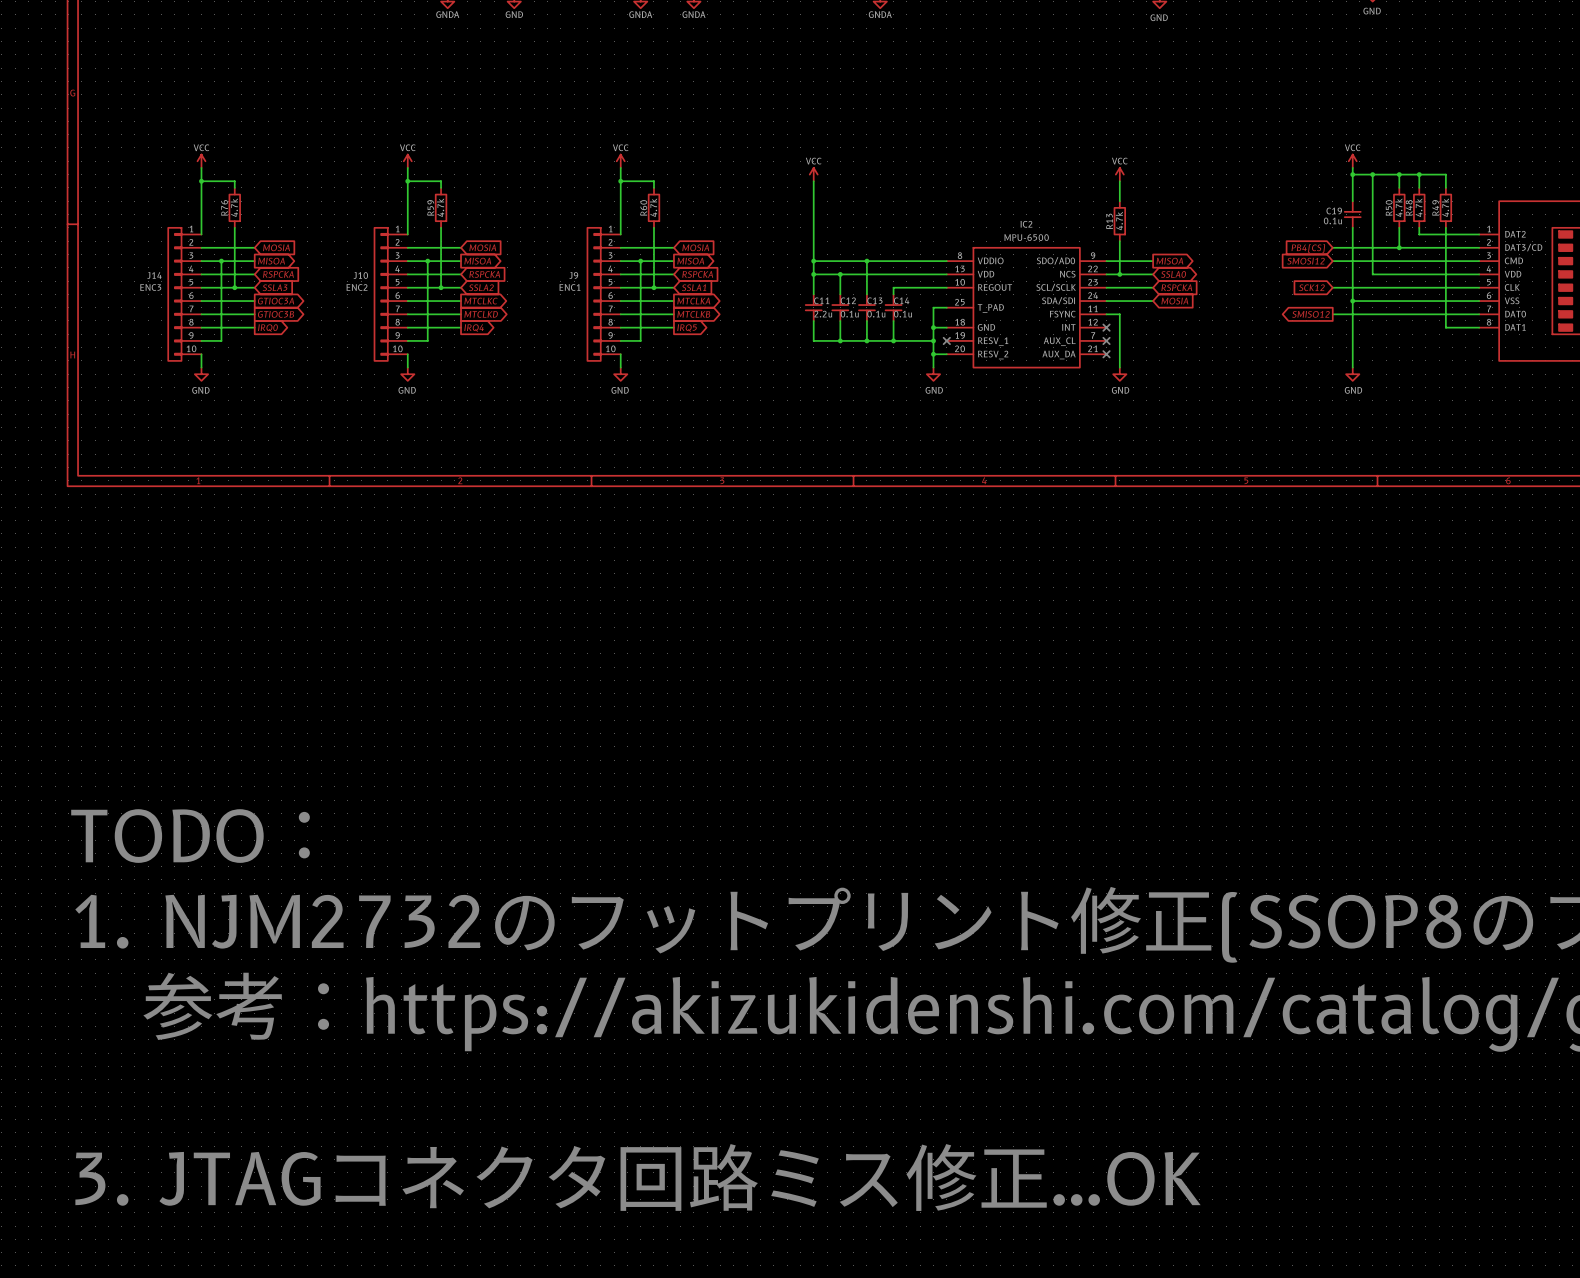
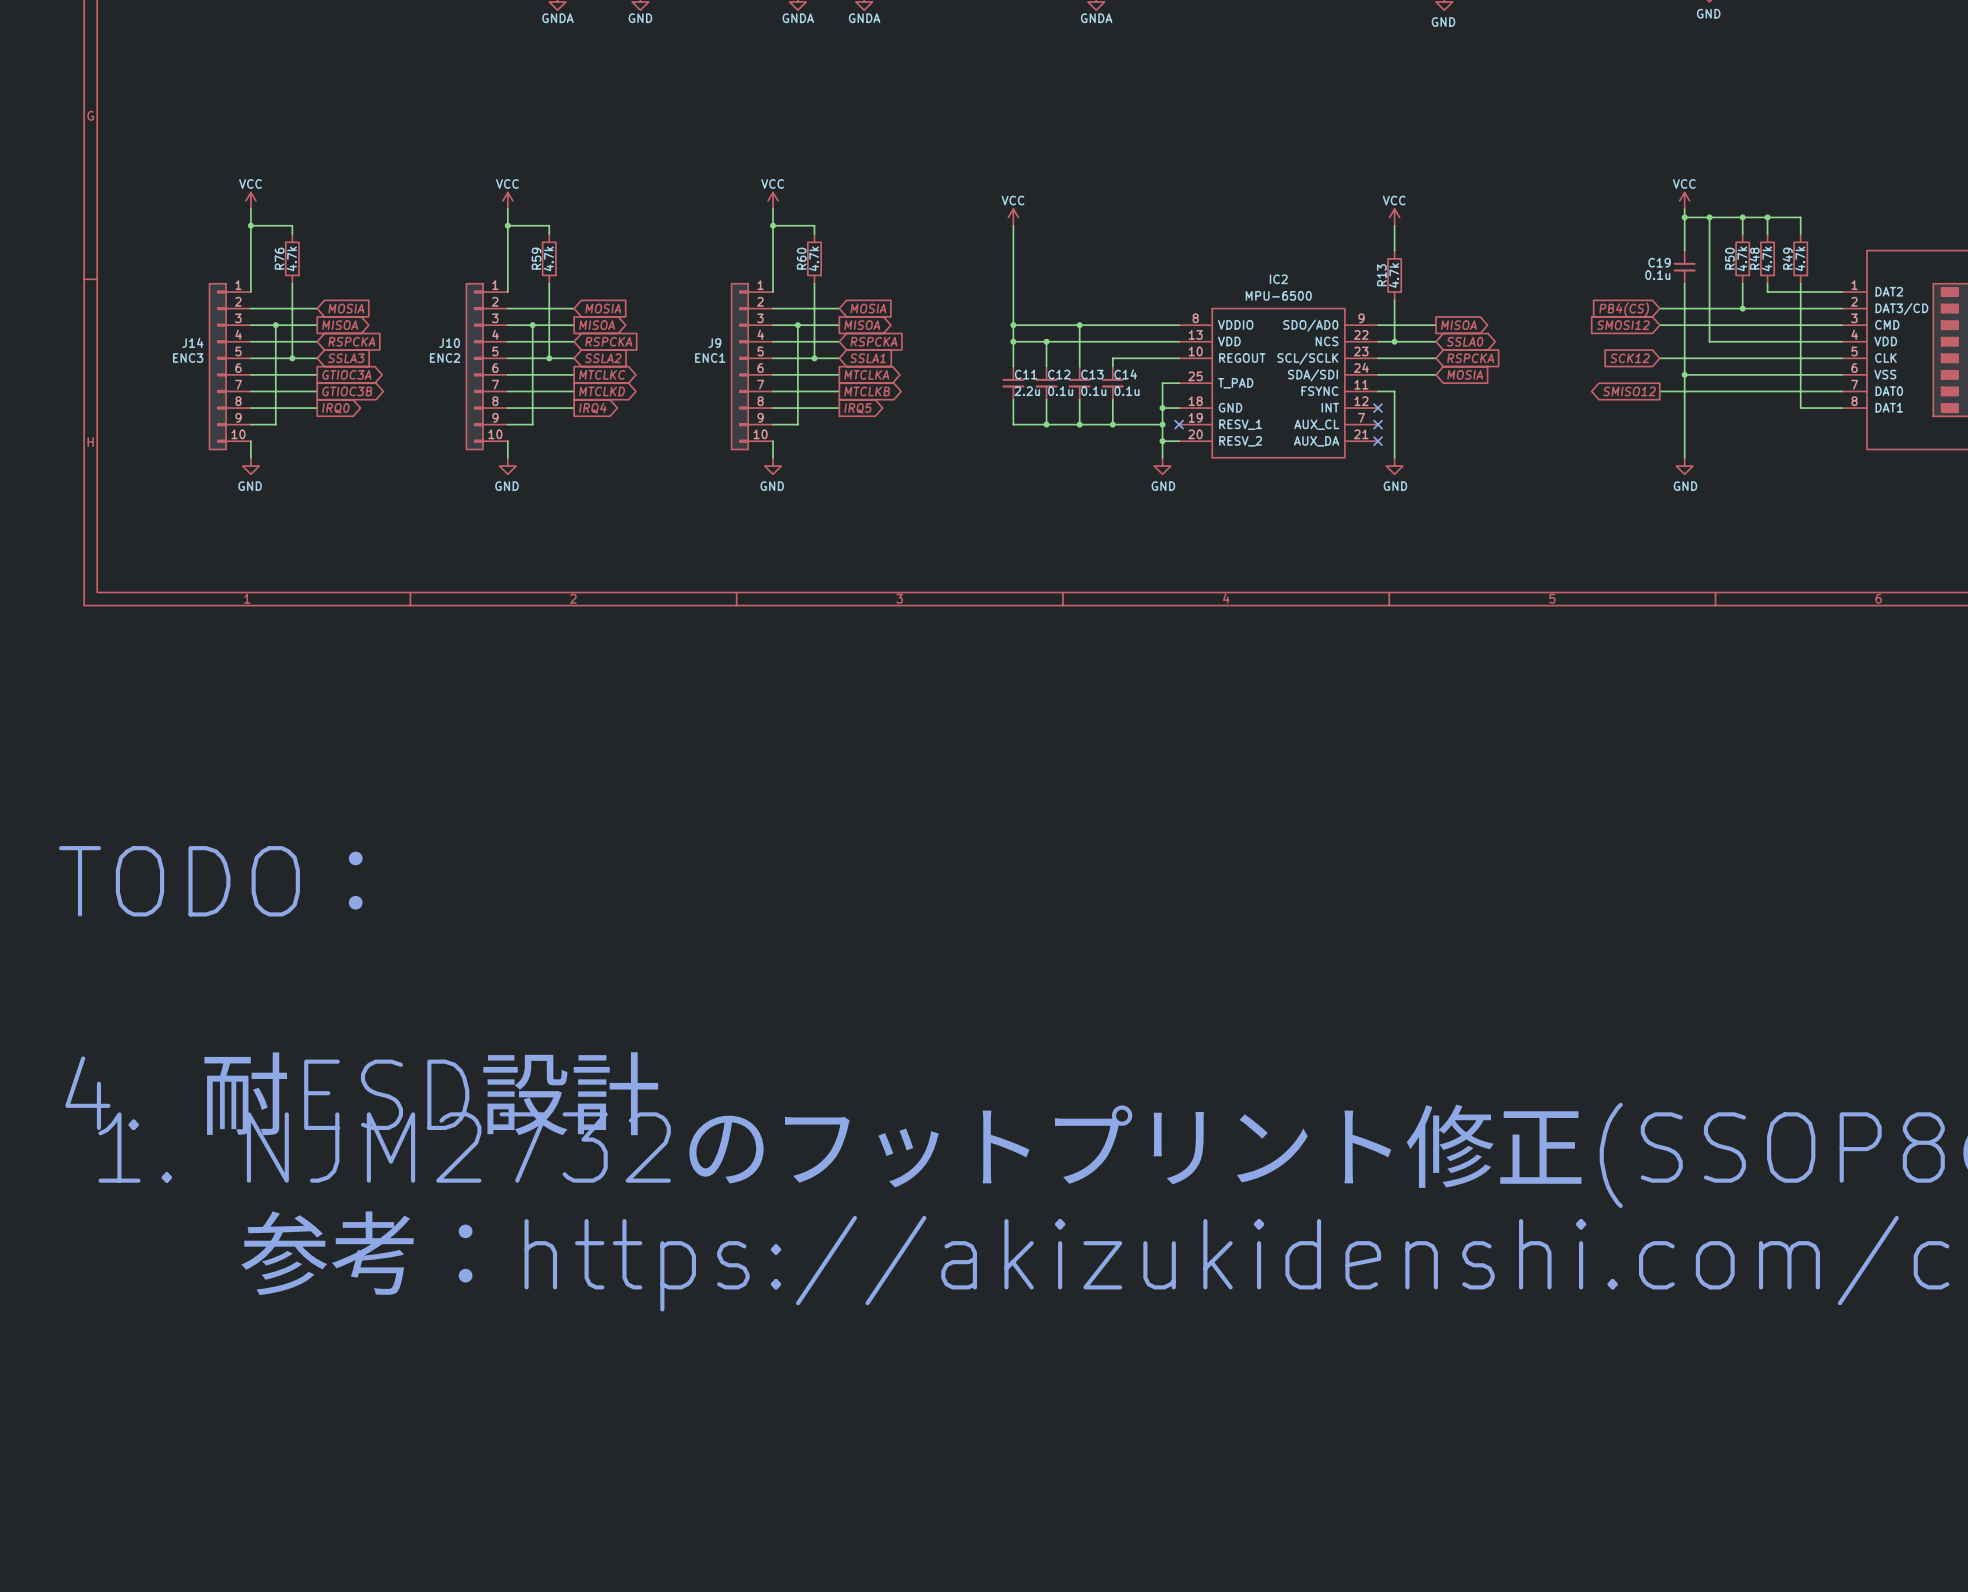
text position: TODO： (190, 836) -> TODO： (211, 881)
text: none -> 4. 耐ESD設計 (362, 1093)
text: 3. JTAGコネクタ回路ミス修正…OK (638, 1177) -> none

